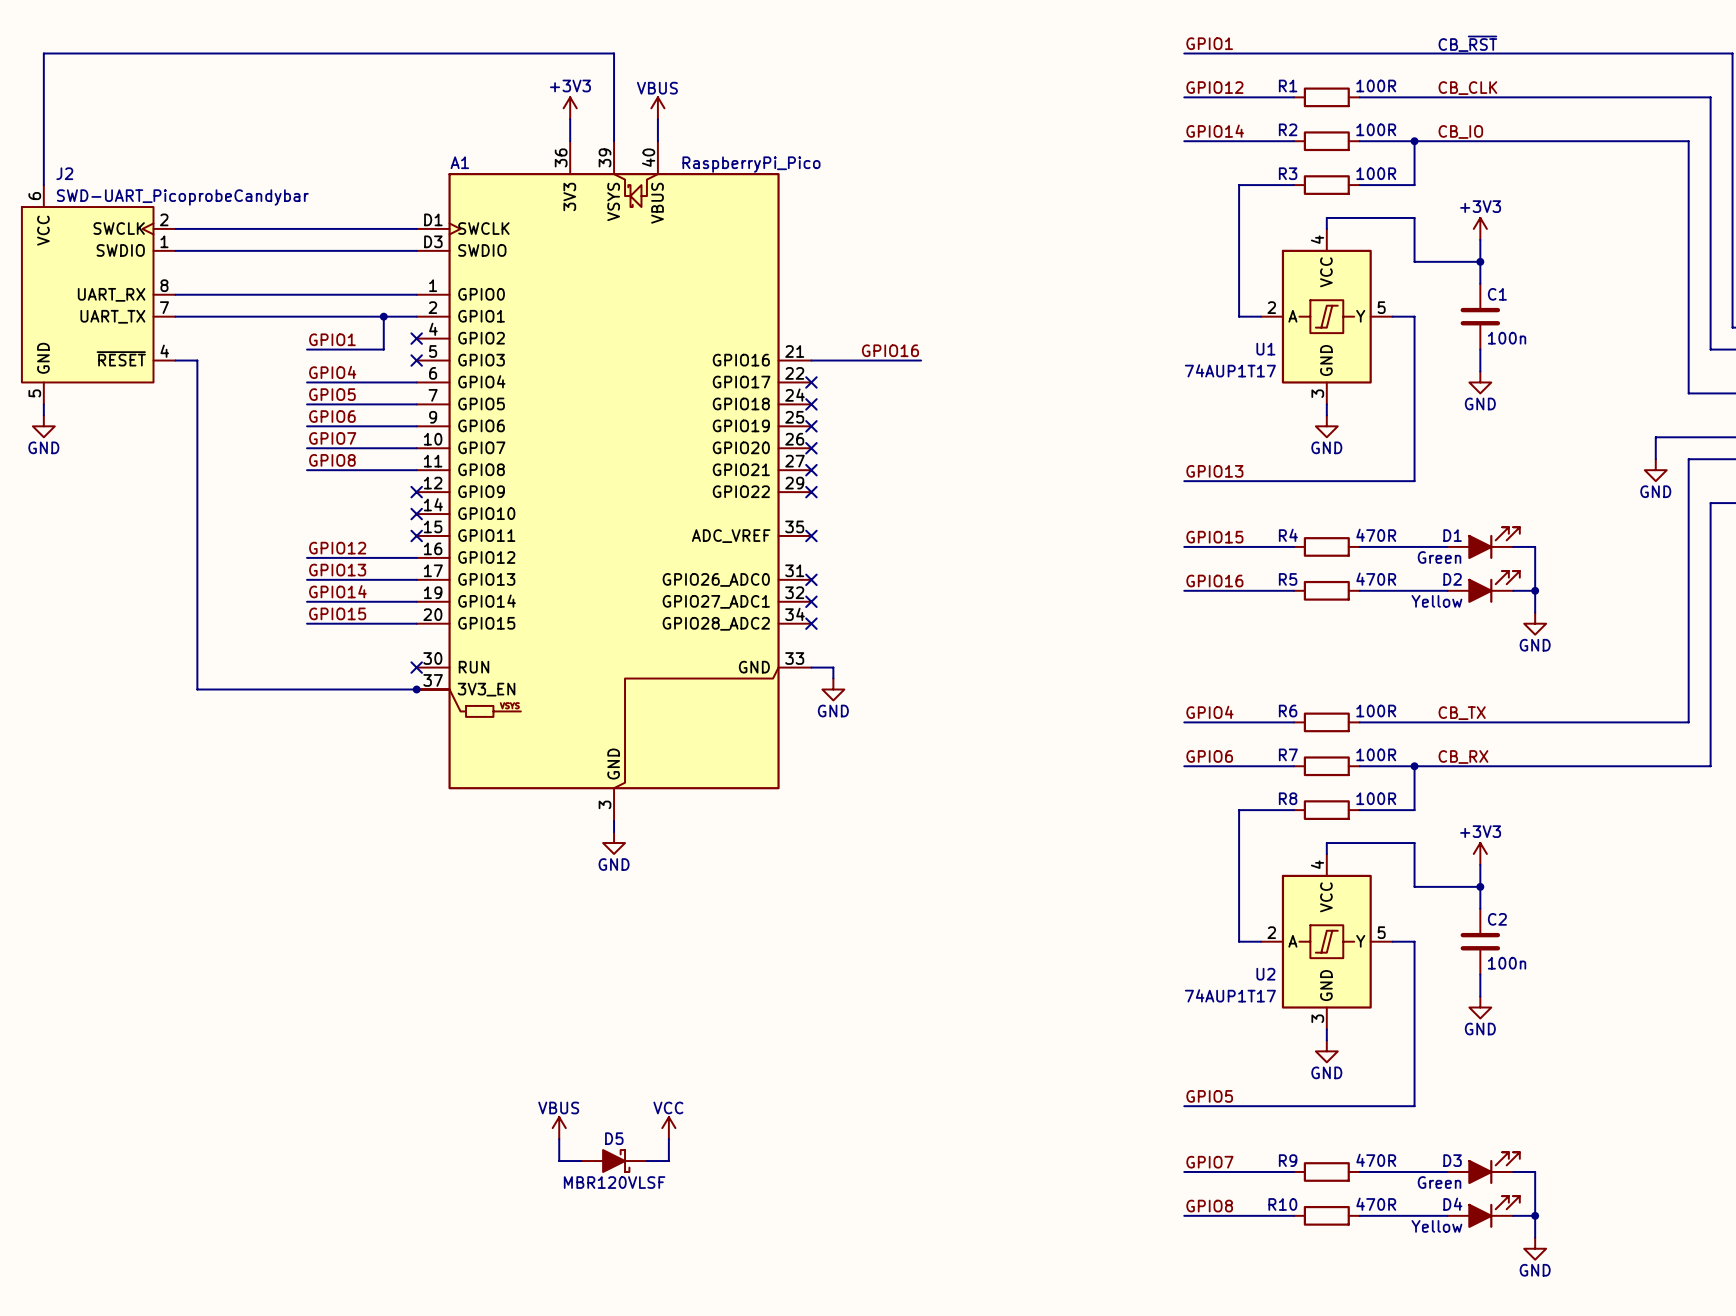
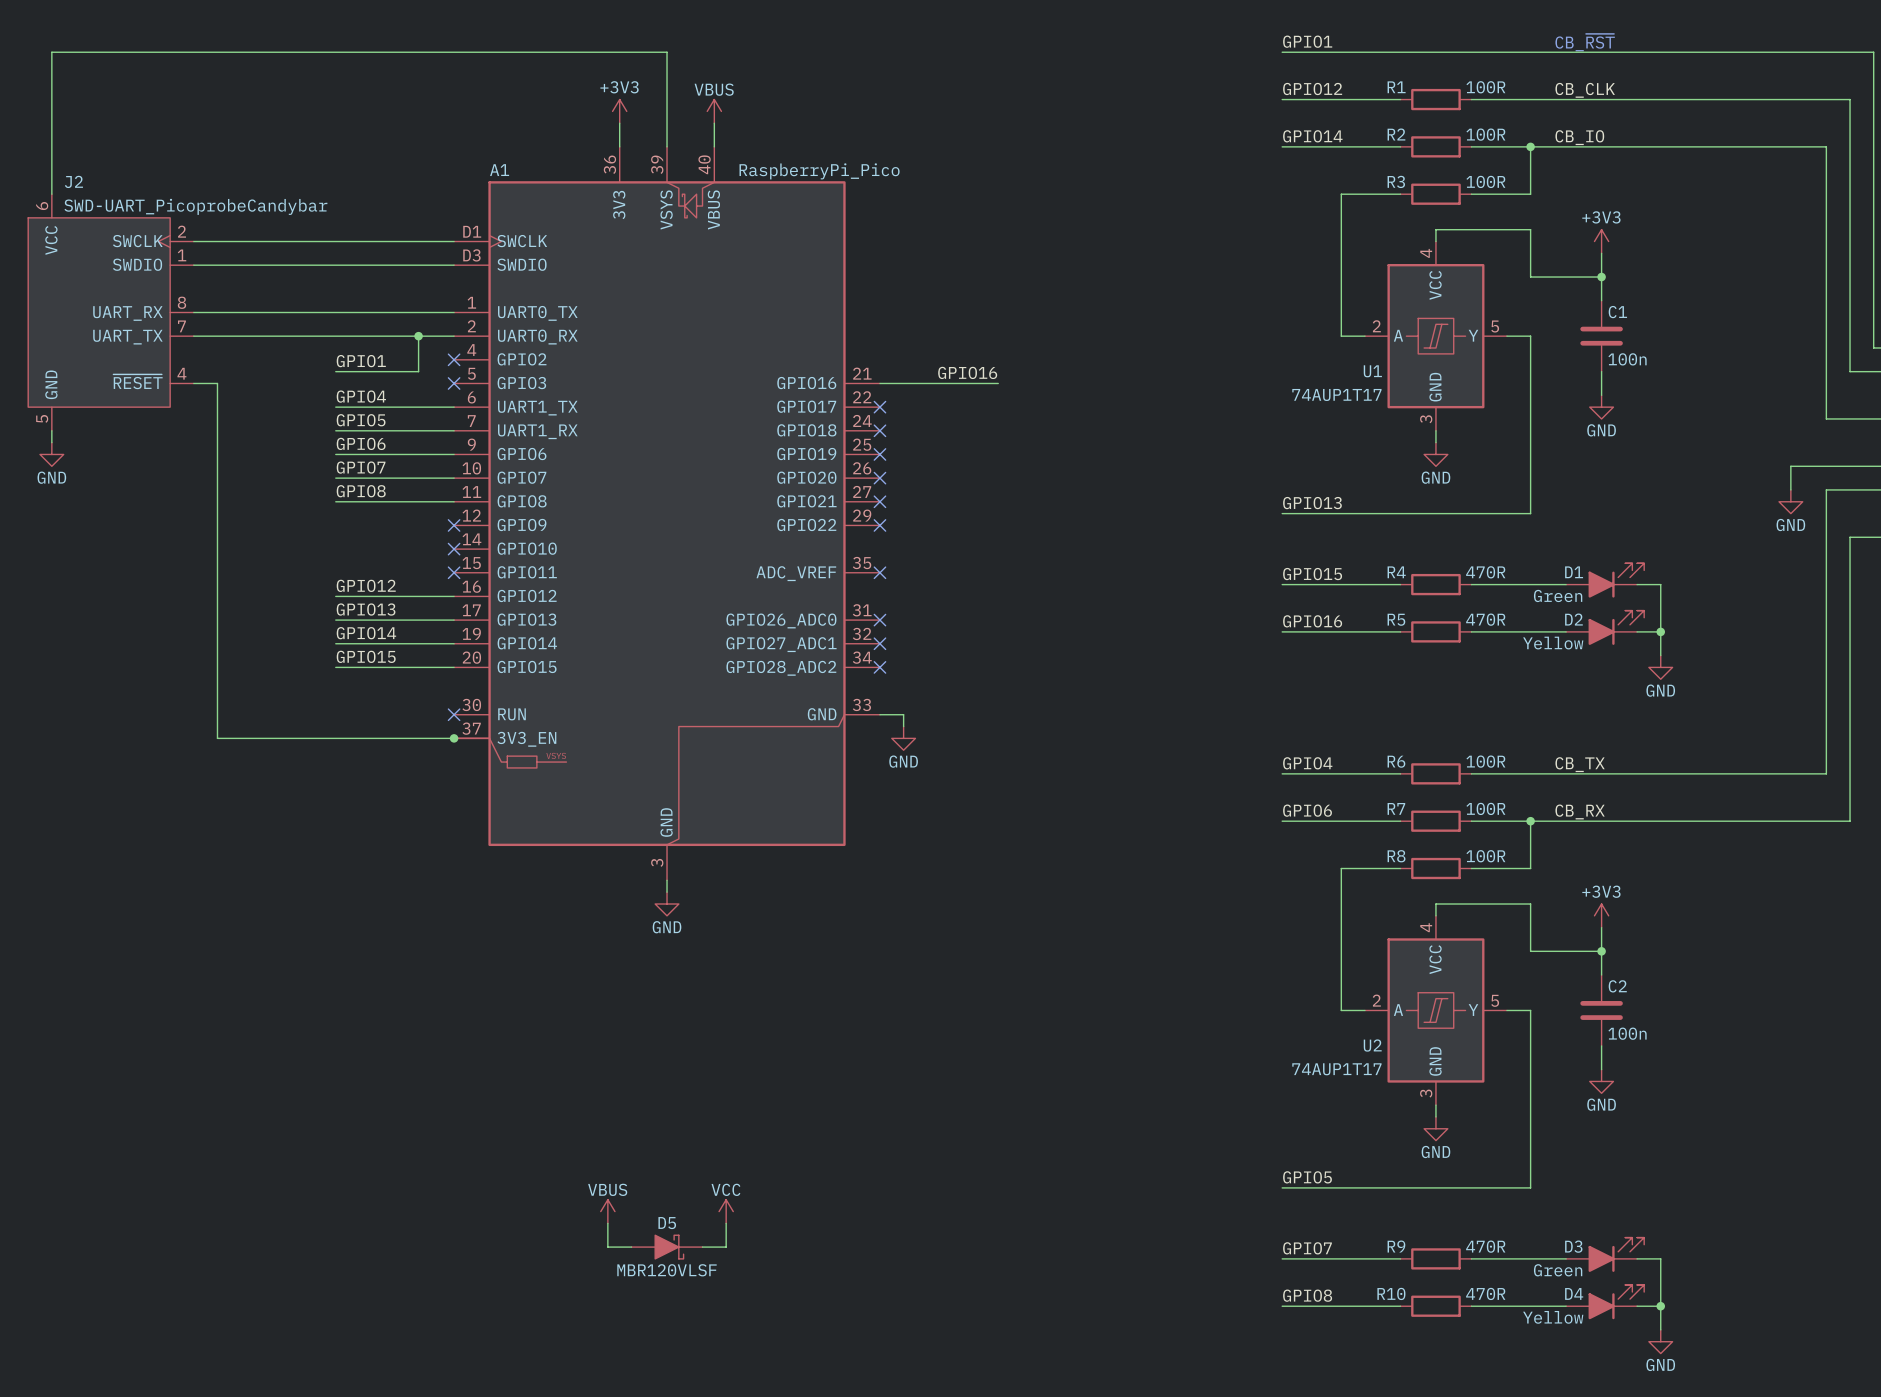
A1 pin name: GPIO0 (481, 294) -> UART0_TX (537, 313)
A1 pin name: GPIO1 (481, 316) -> UART0_RX (537, 337)
A1 pin name: GPIO4 (481, 381) -> UART1_TX (537, 408)
A1 pin name: GPIO5 (481, 403) -> UART1_RX (537, 431)

